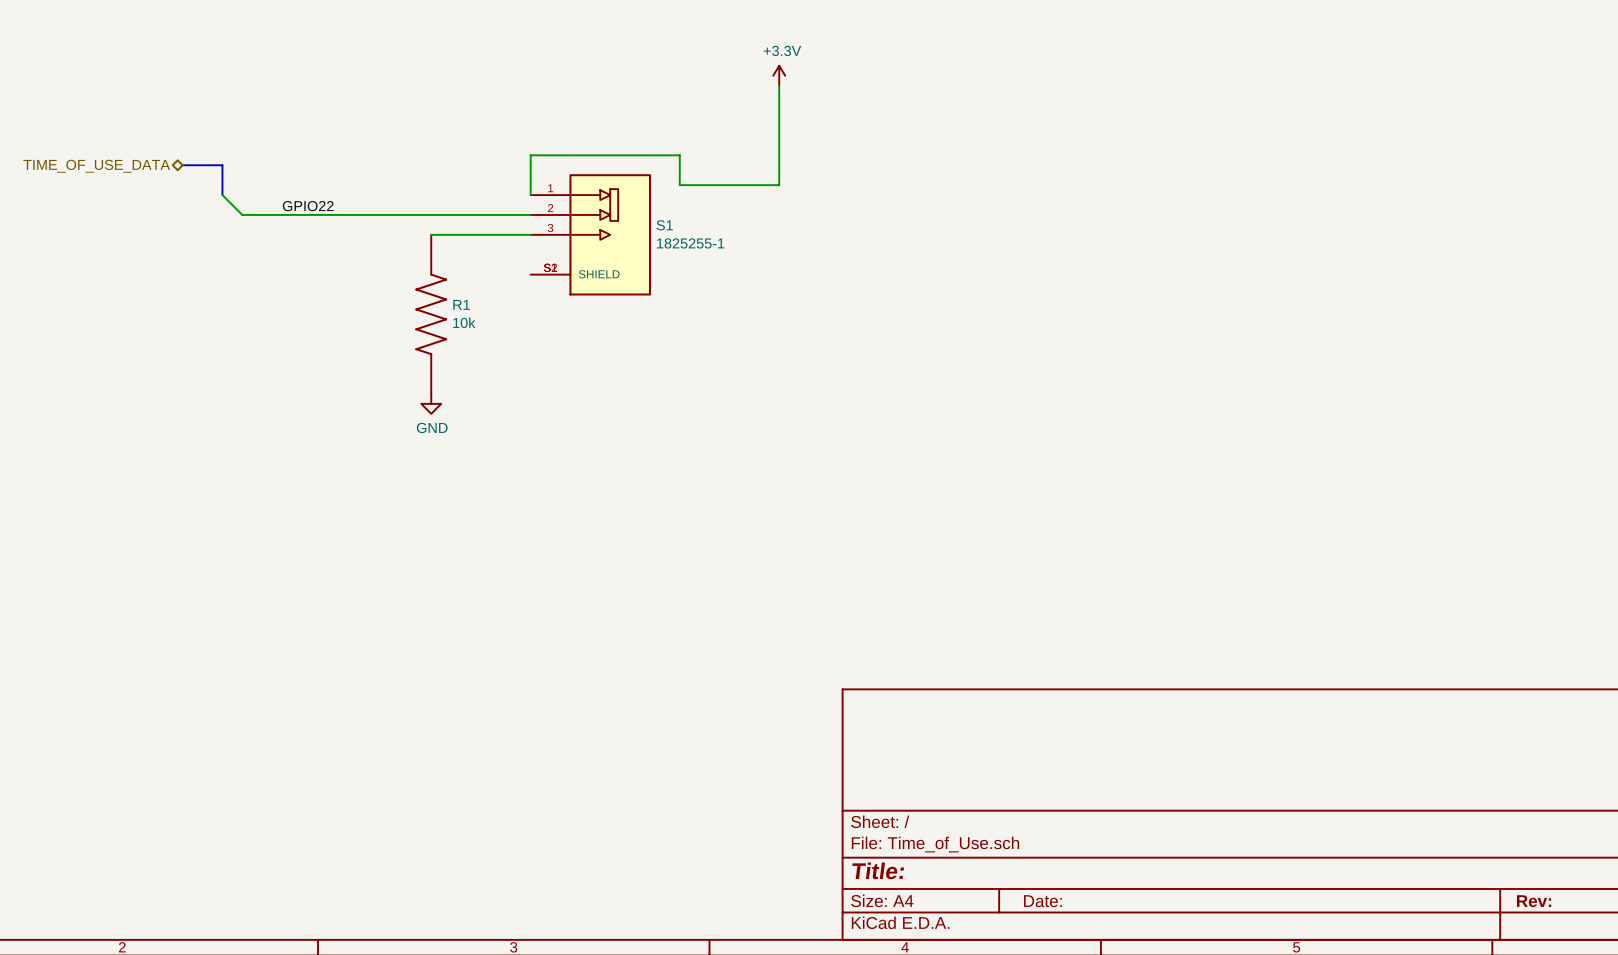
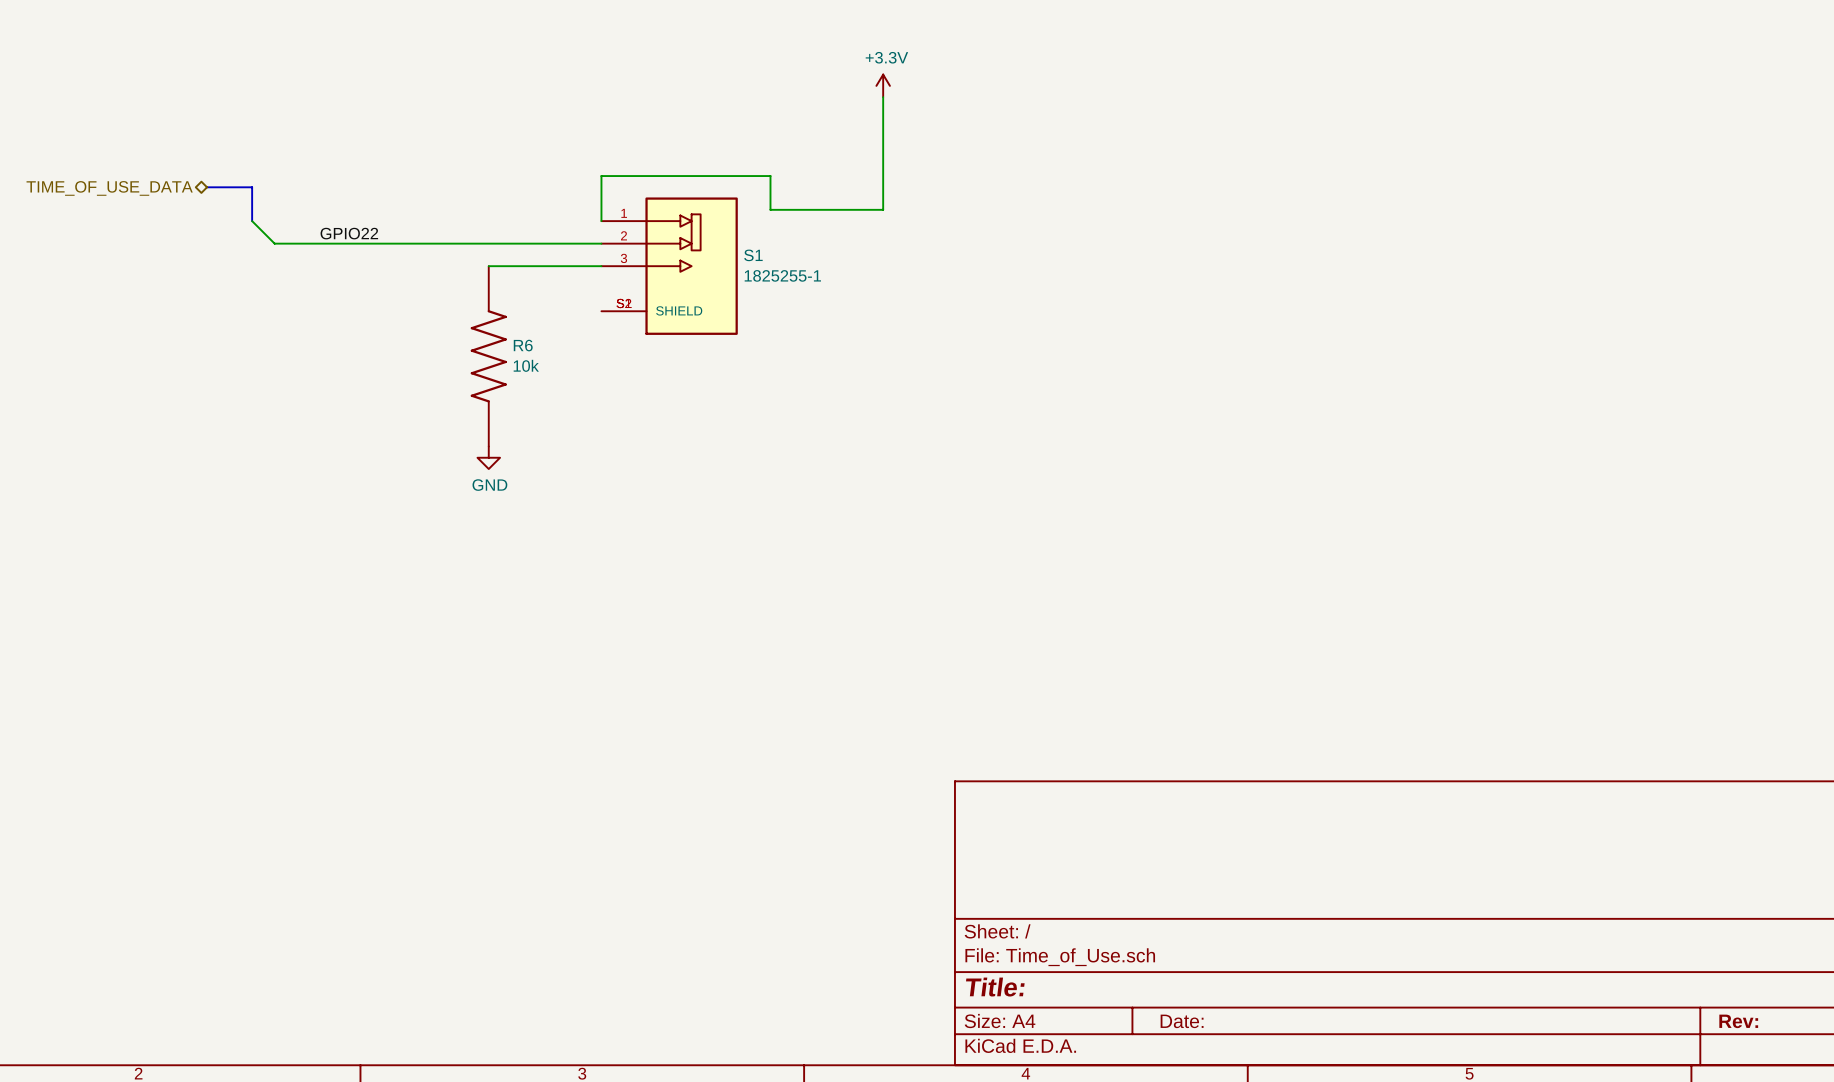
R1 name: R1 (461, 304) -> R6 (523, 345)

